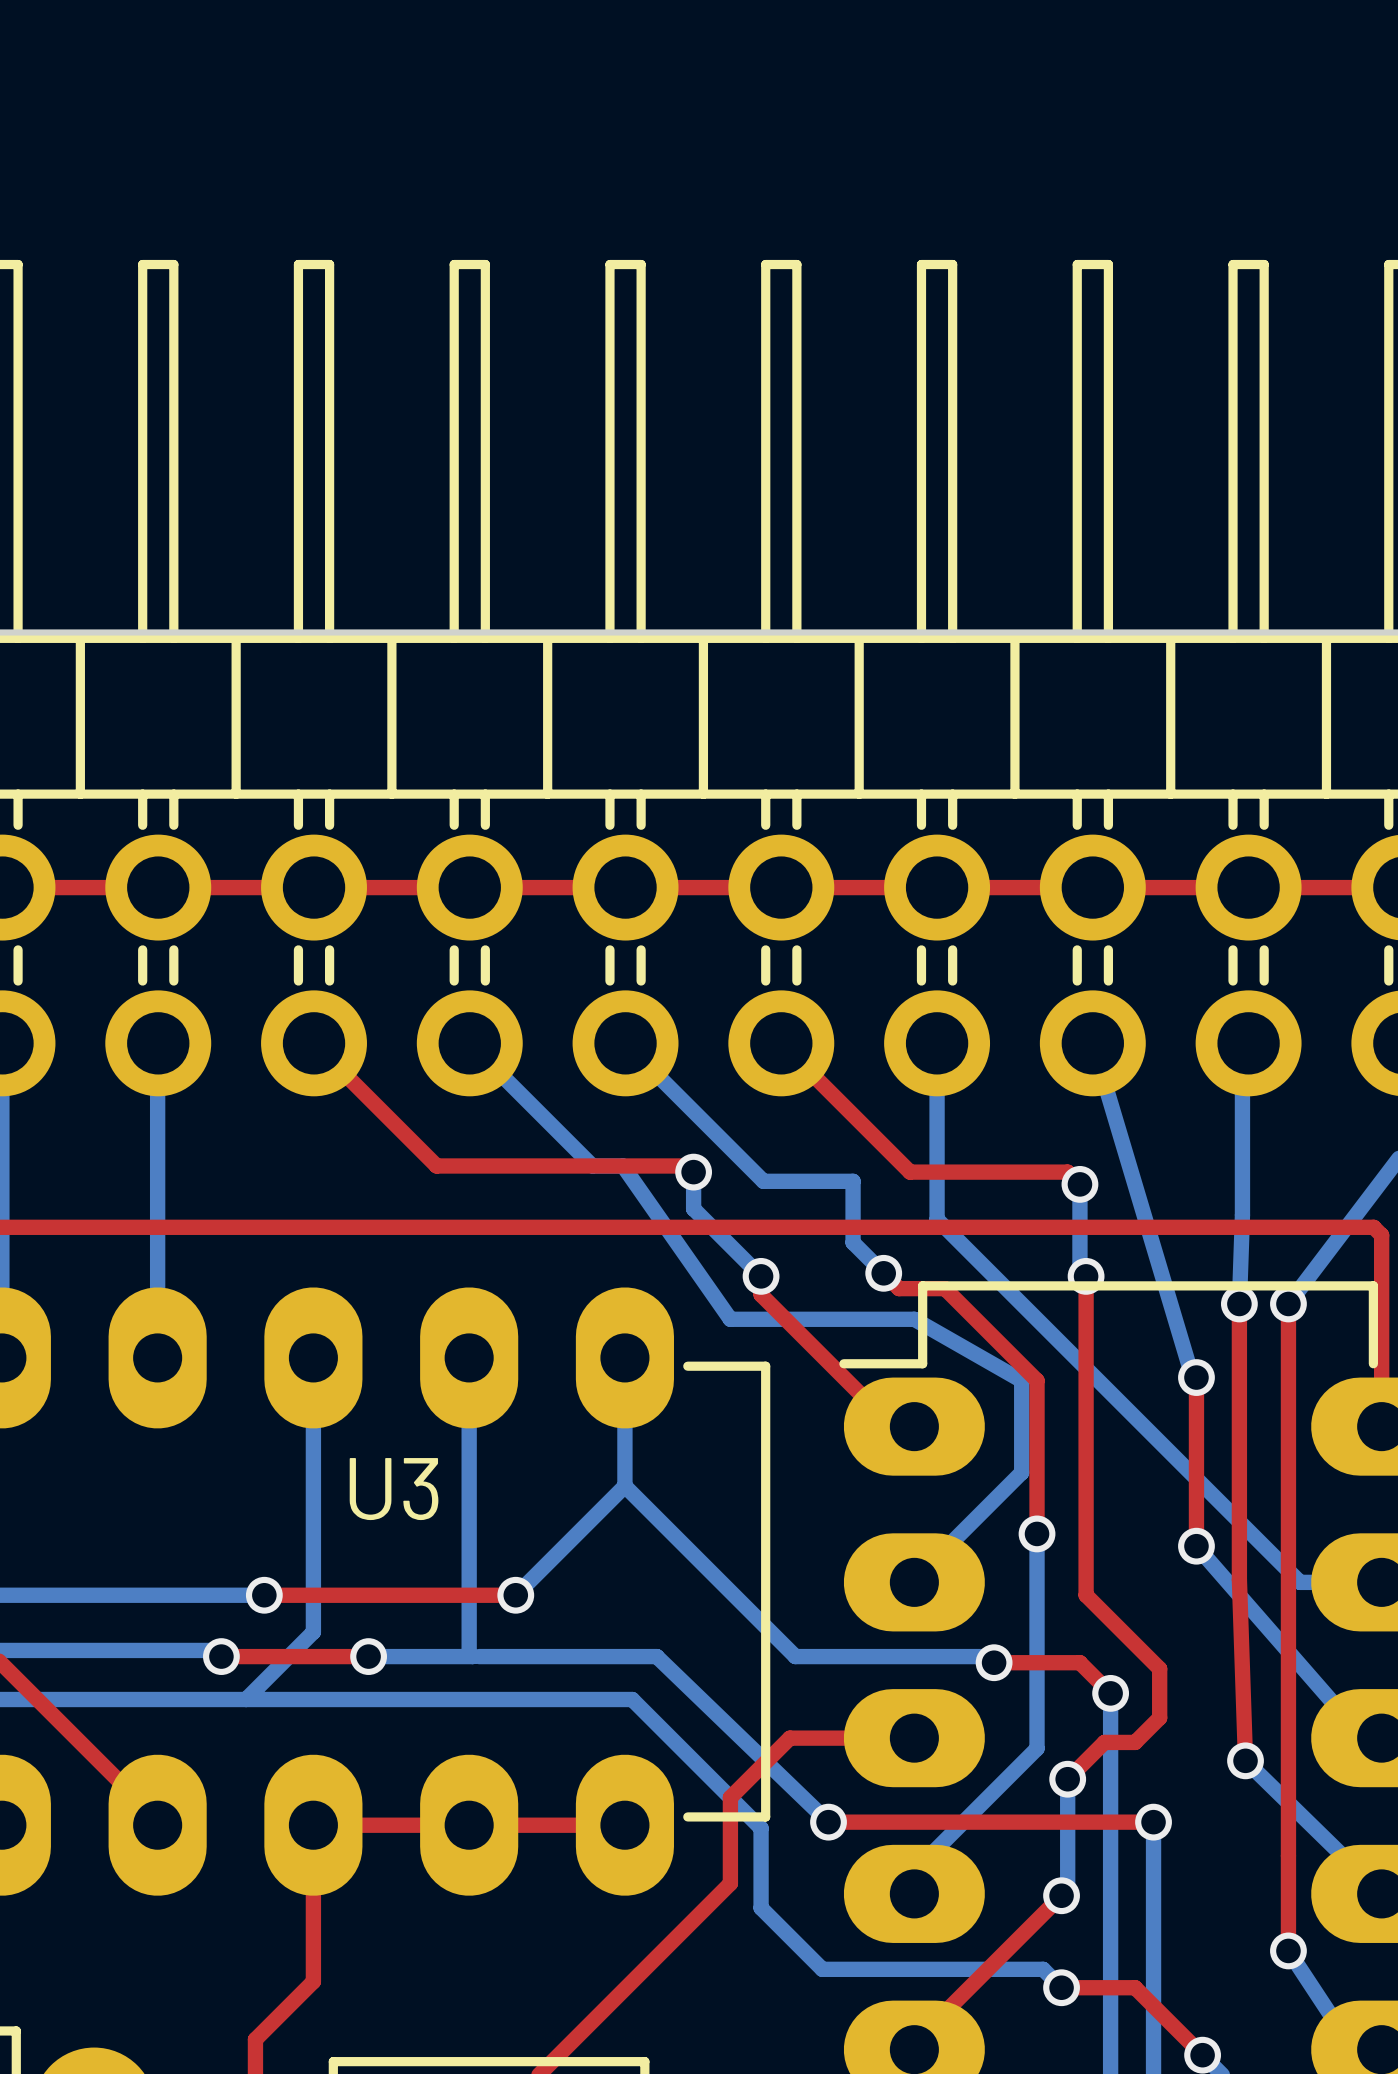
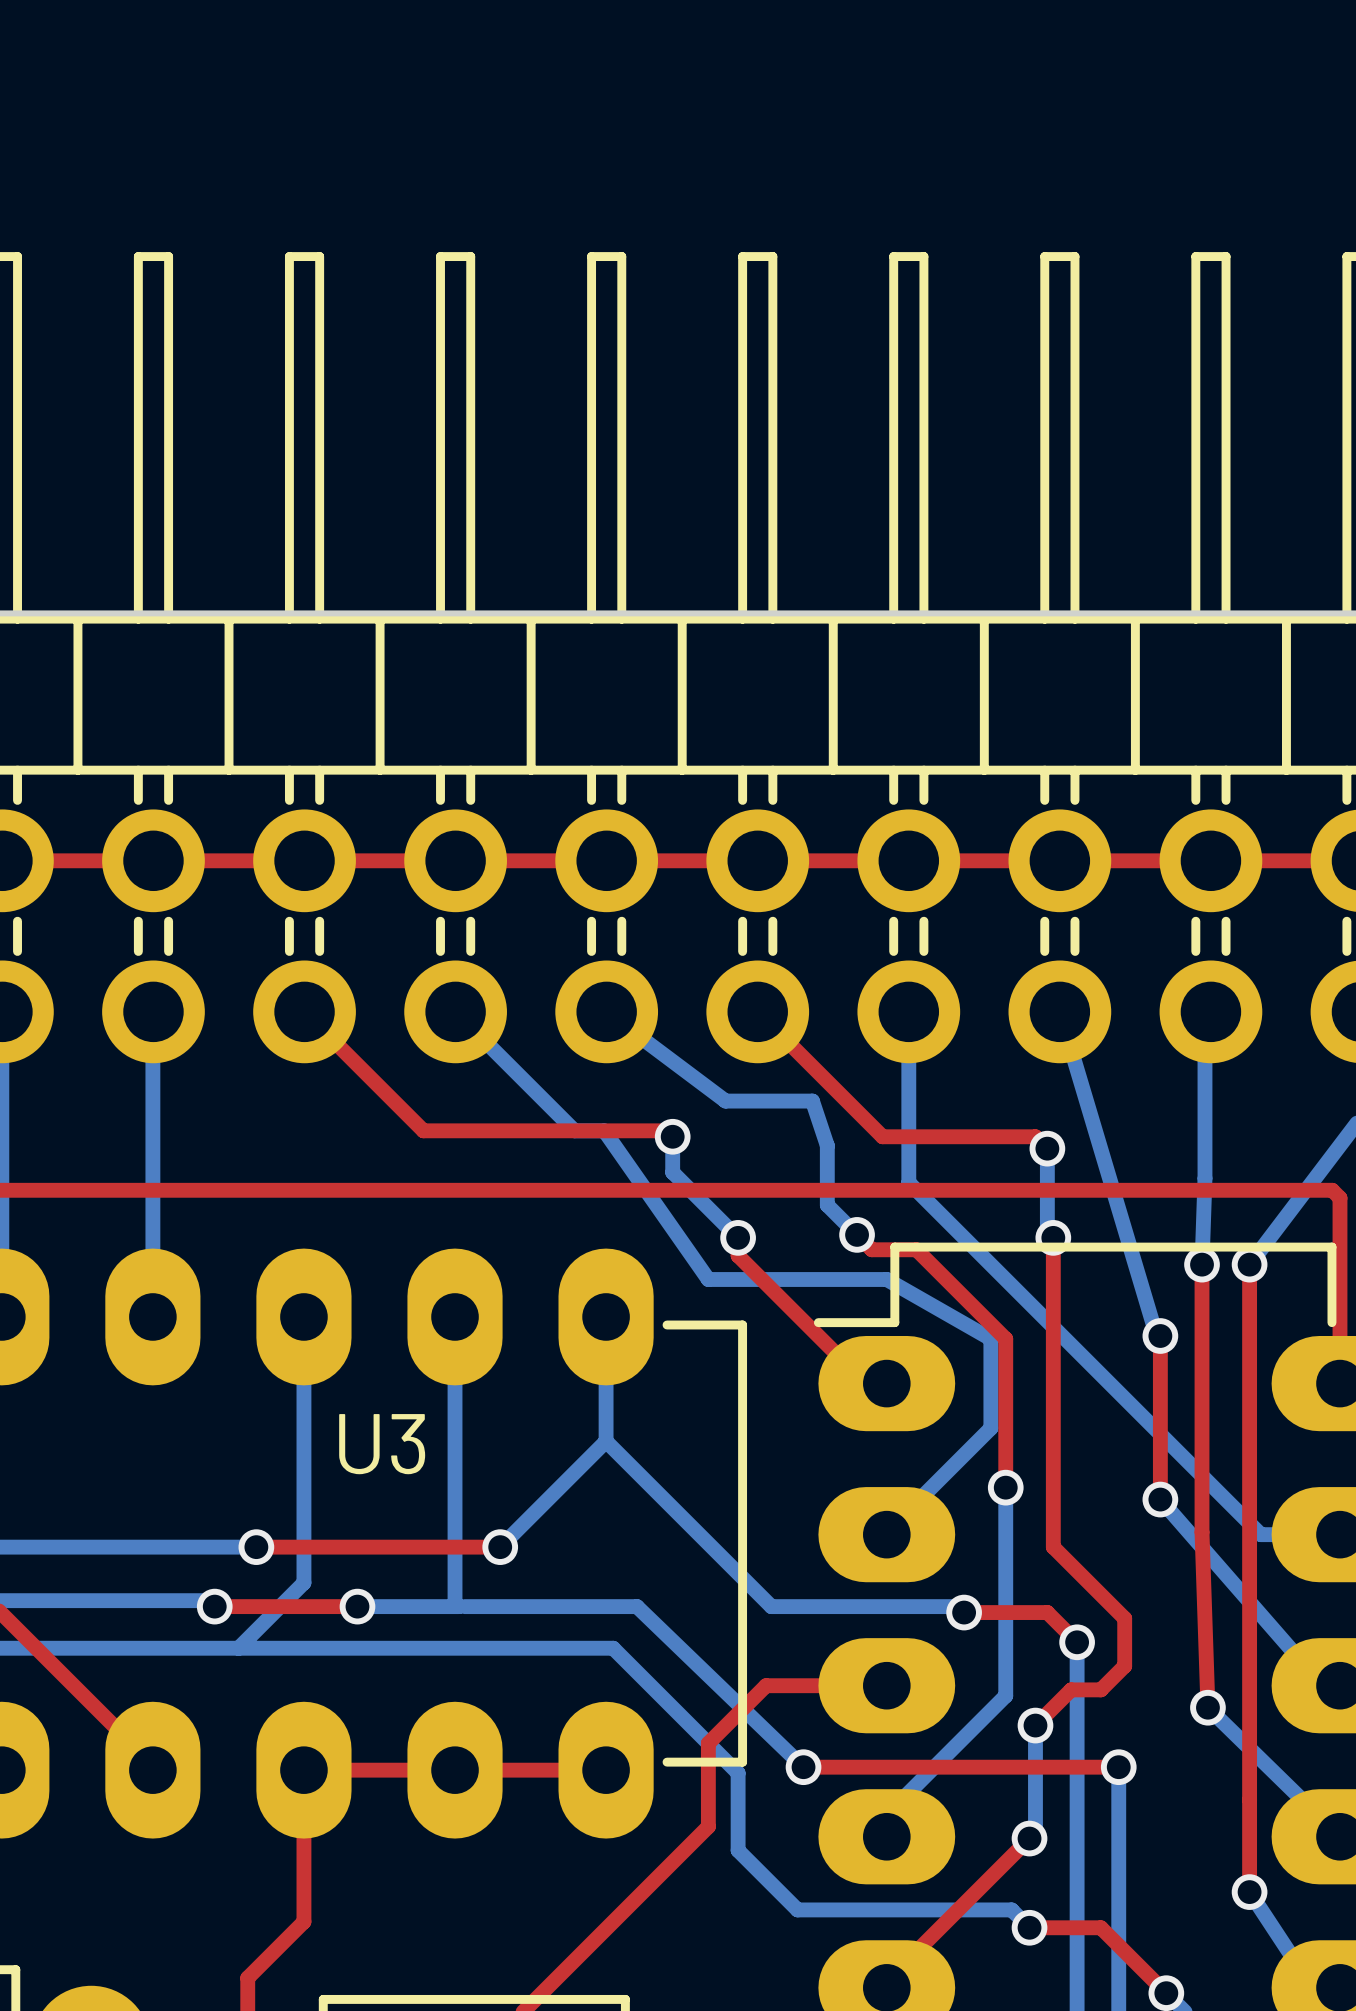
bottom track: (625, 1043) (763, 1181) (853, 1181) -> (606, 1011) (725, 1101) (812, 1101) (827, 1145)

